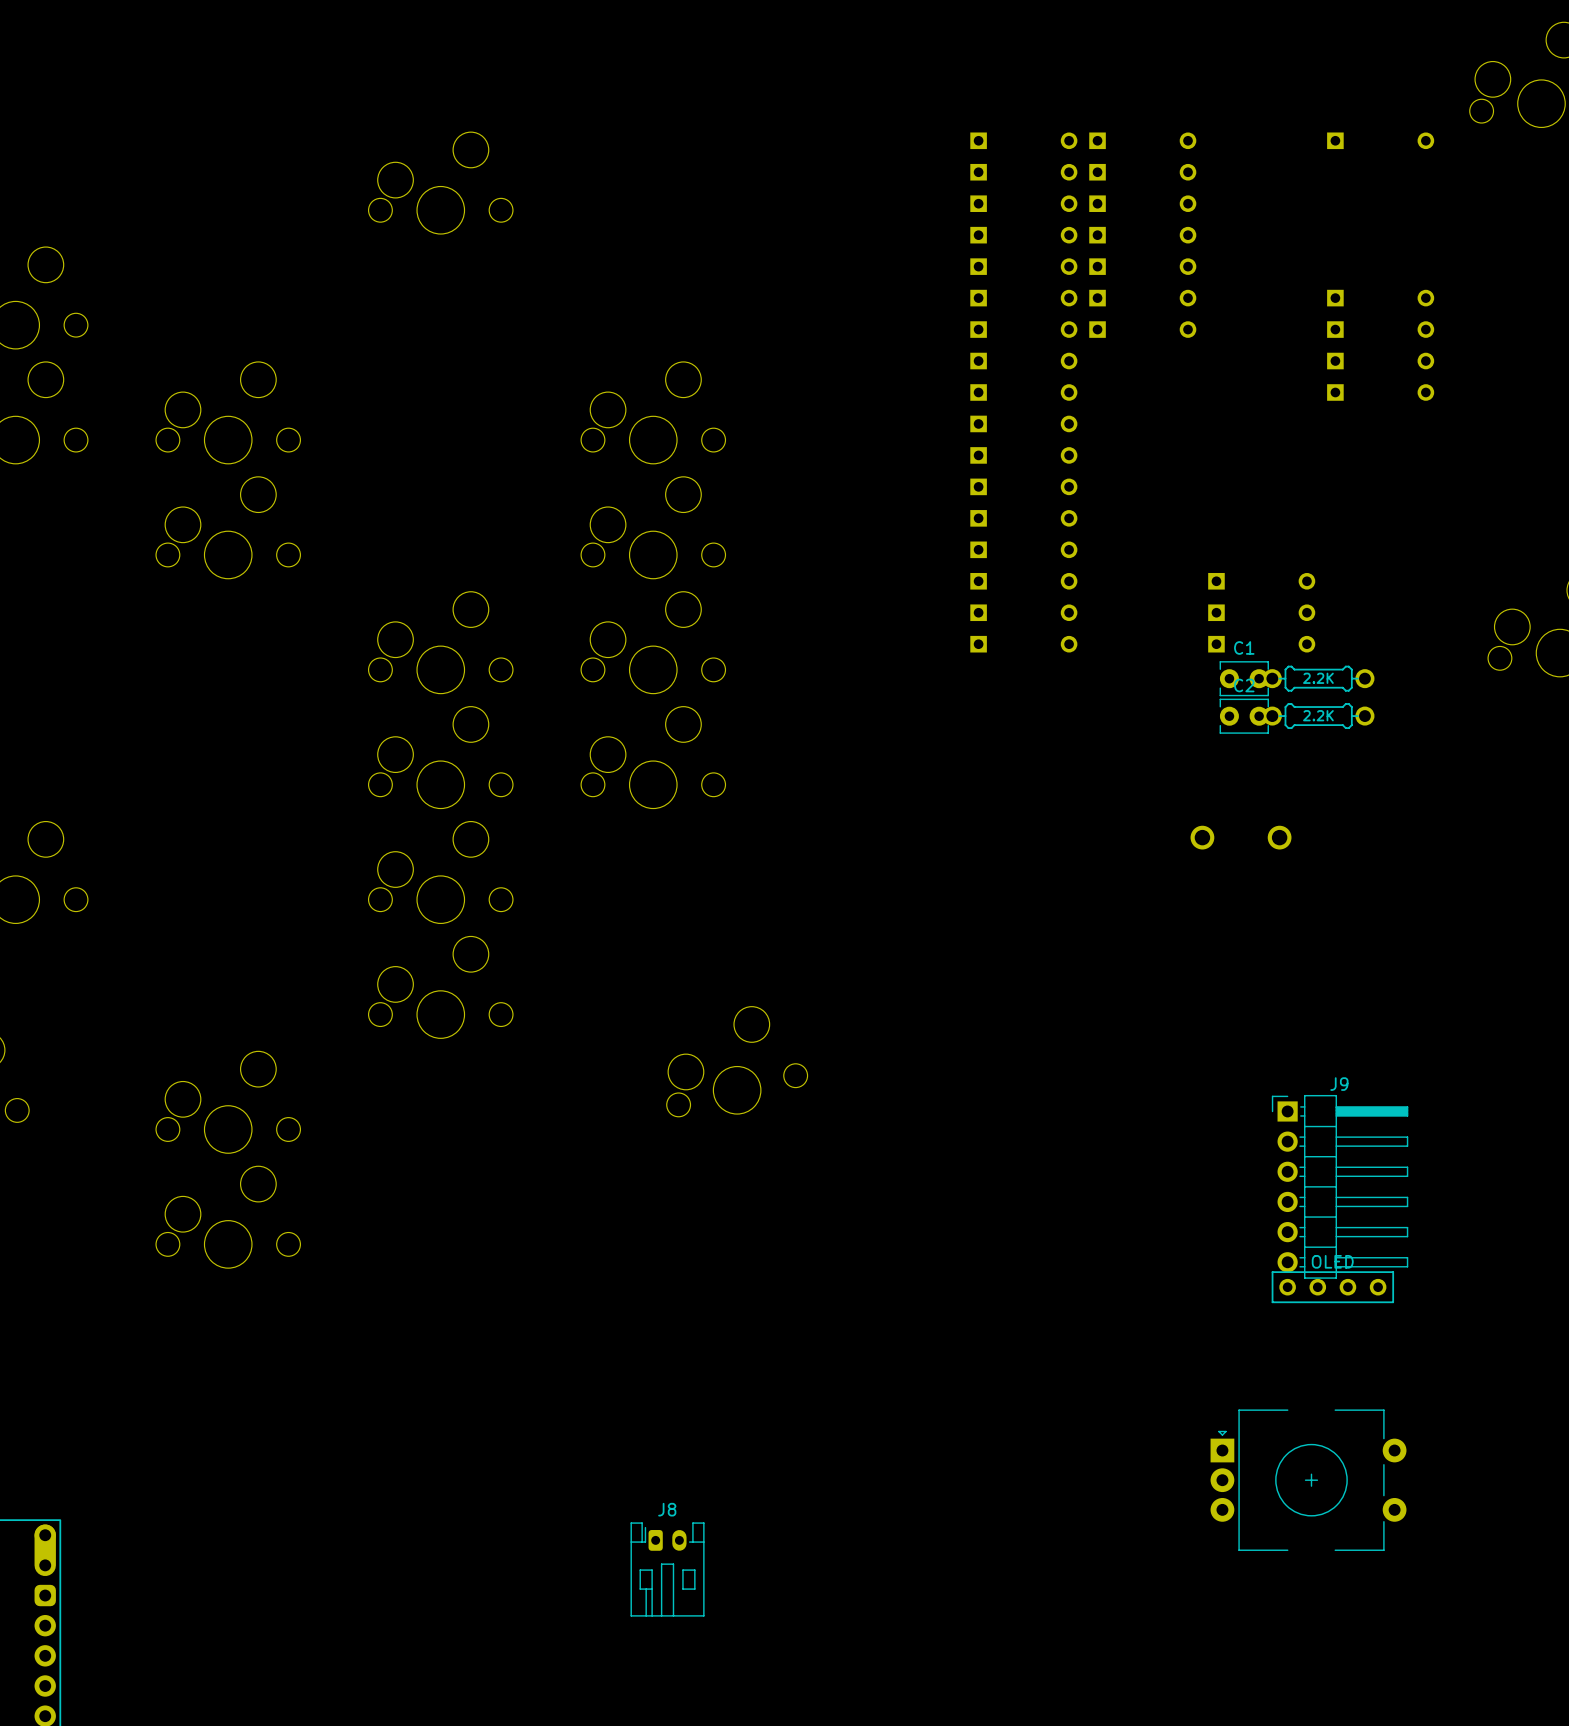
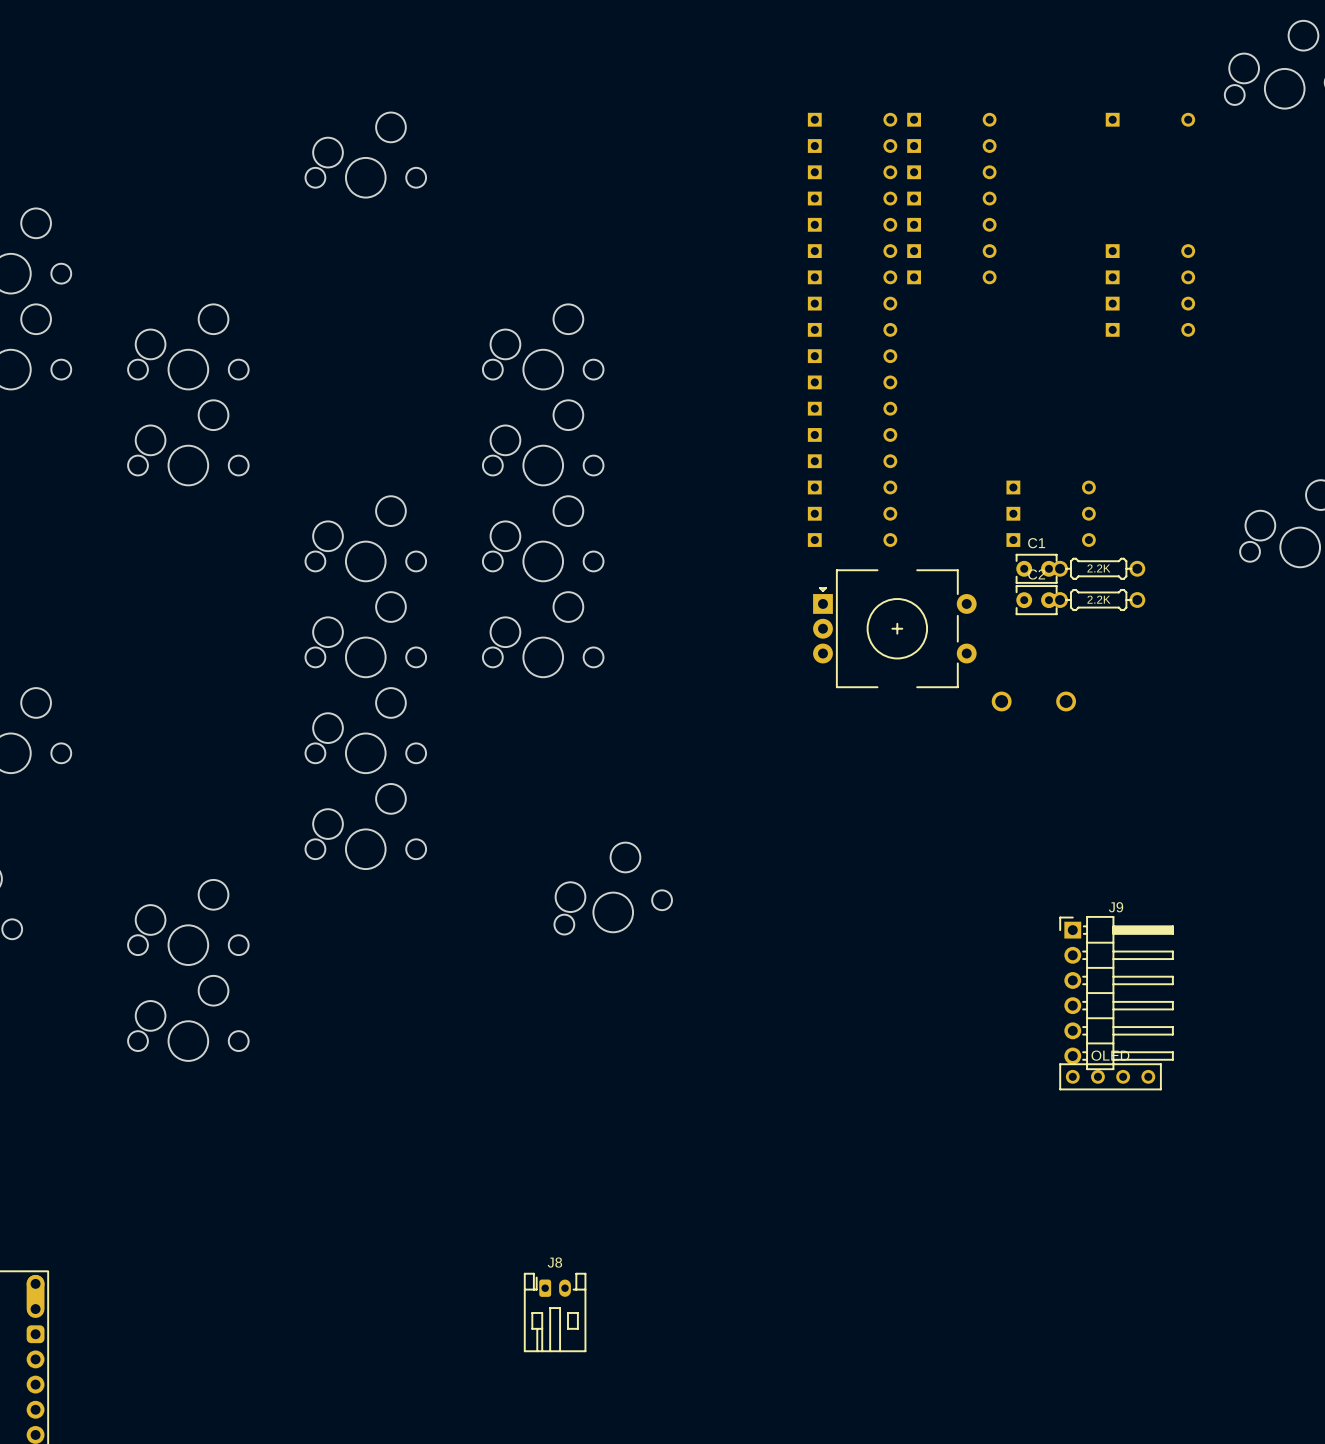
part: none -> (894, 628)
part: (1308, 1480) -> none

